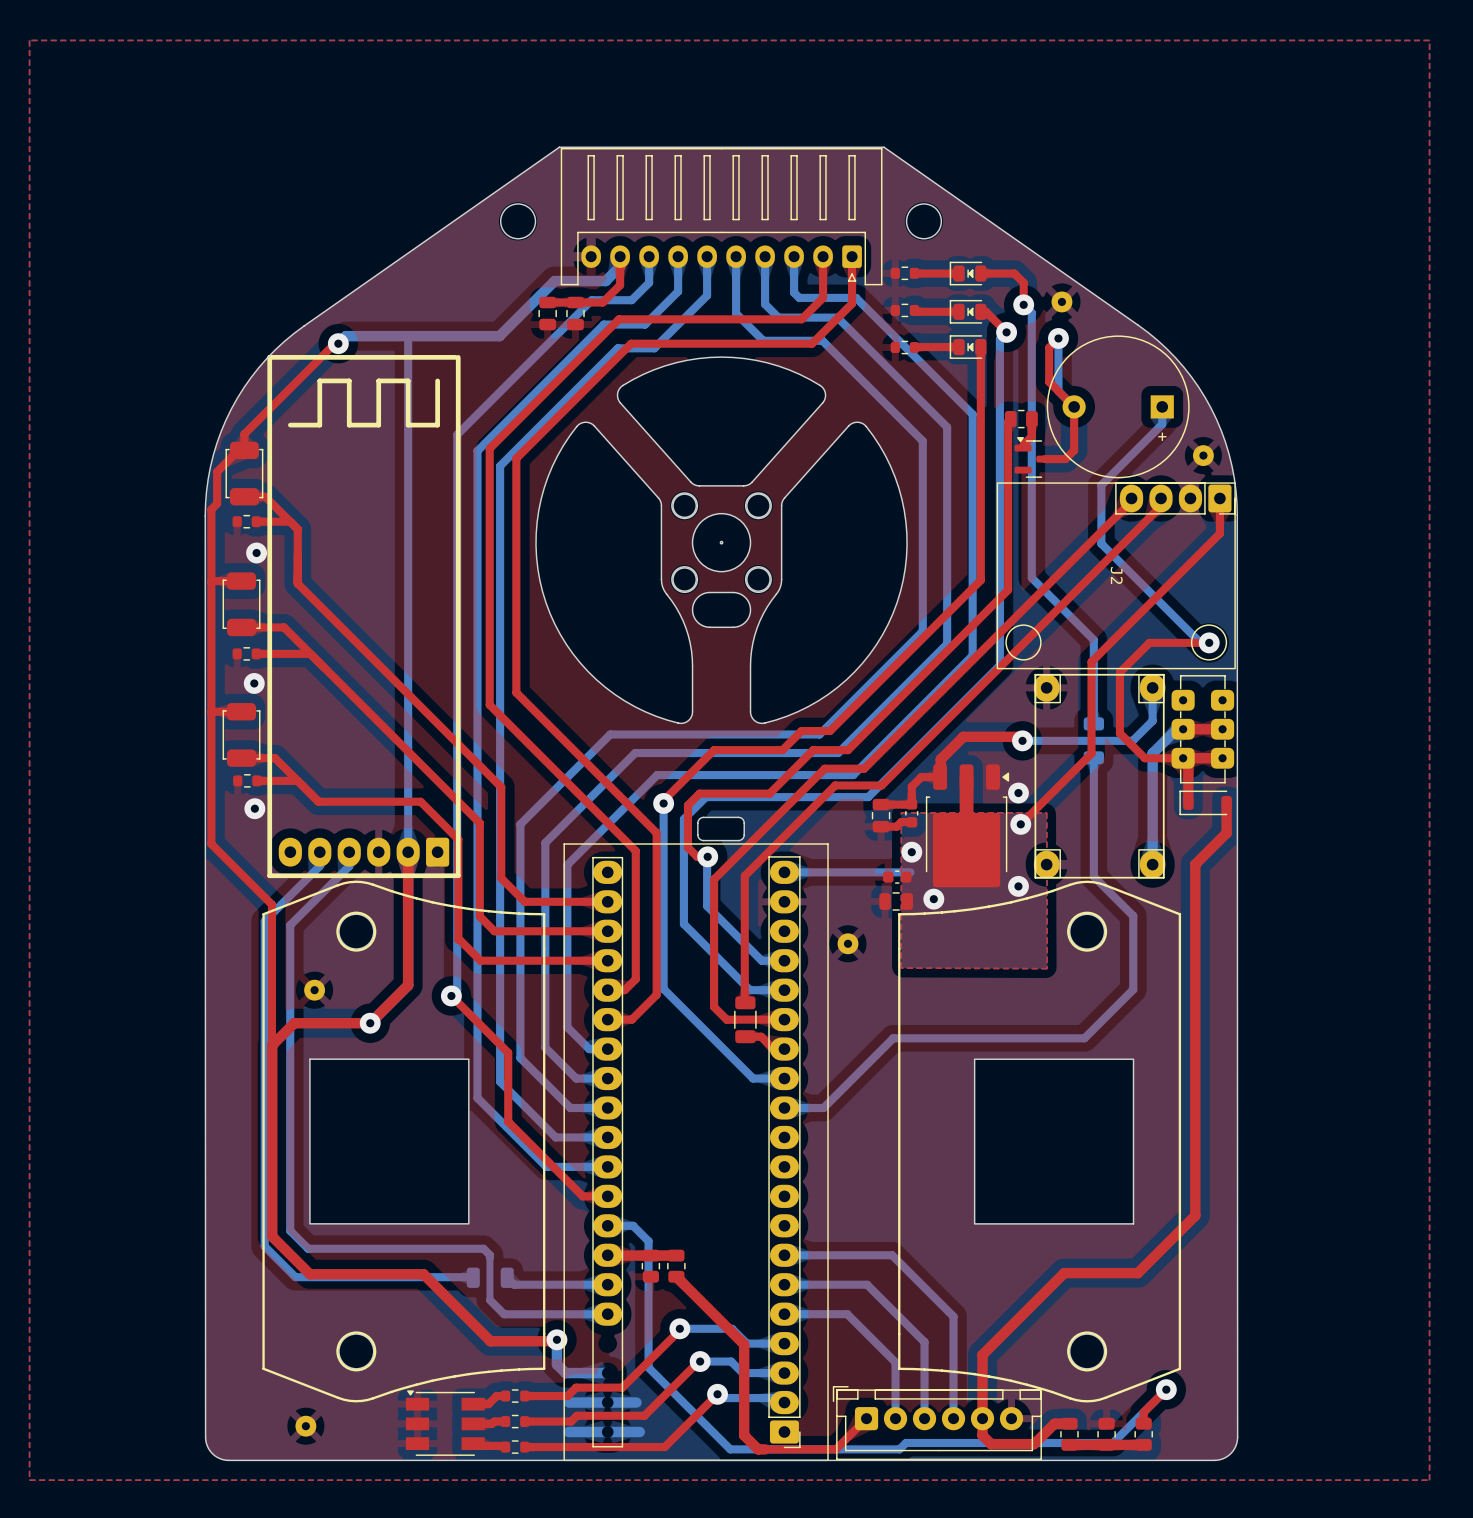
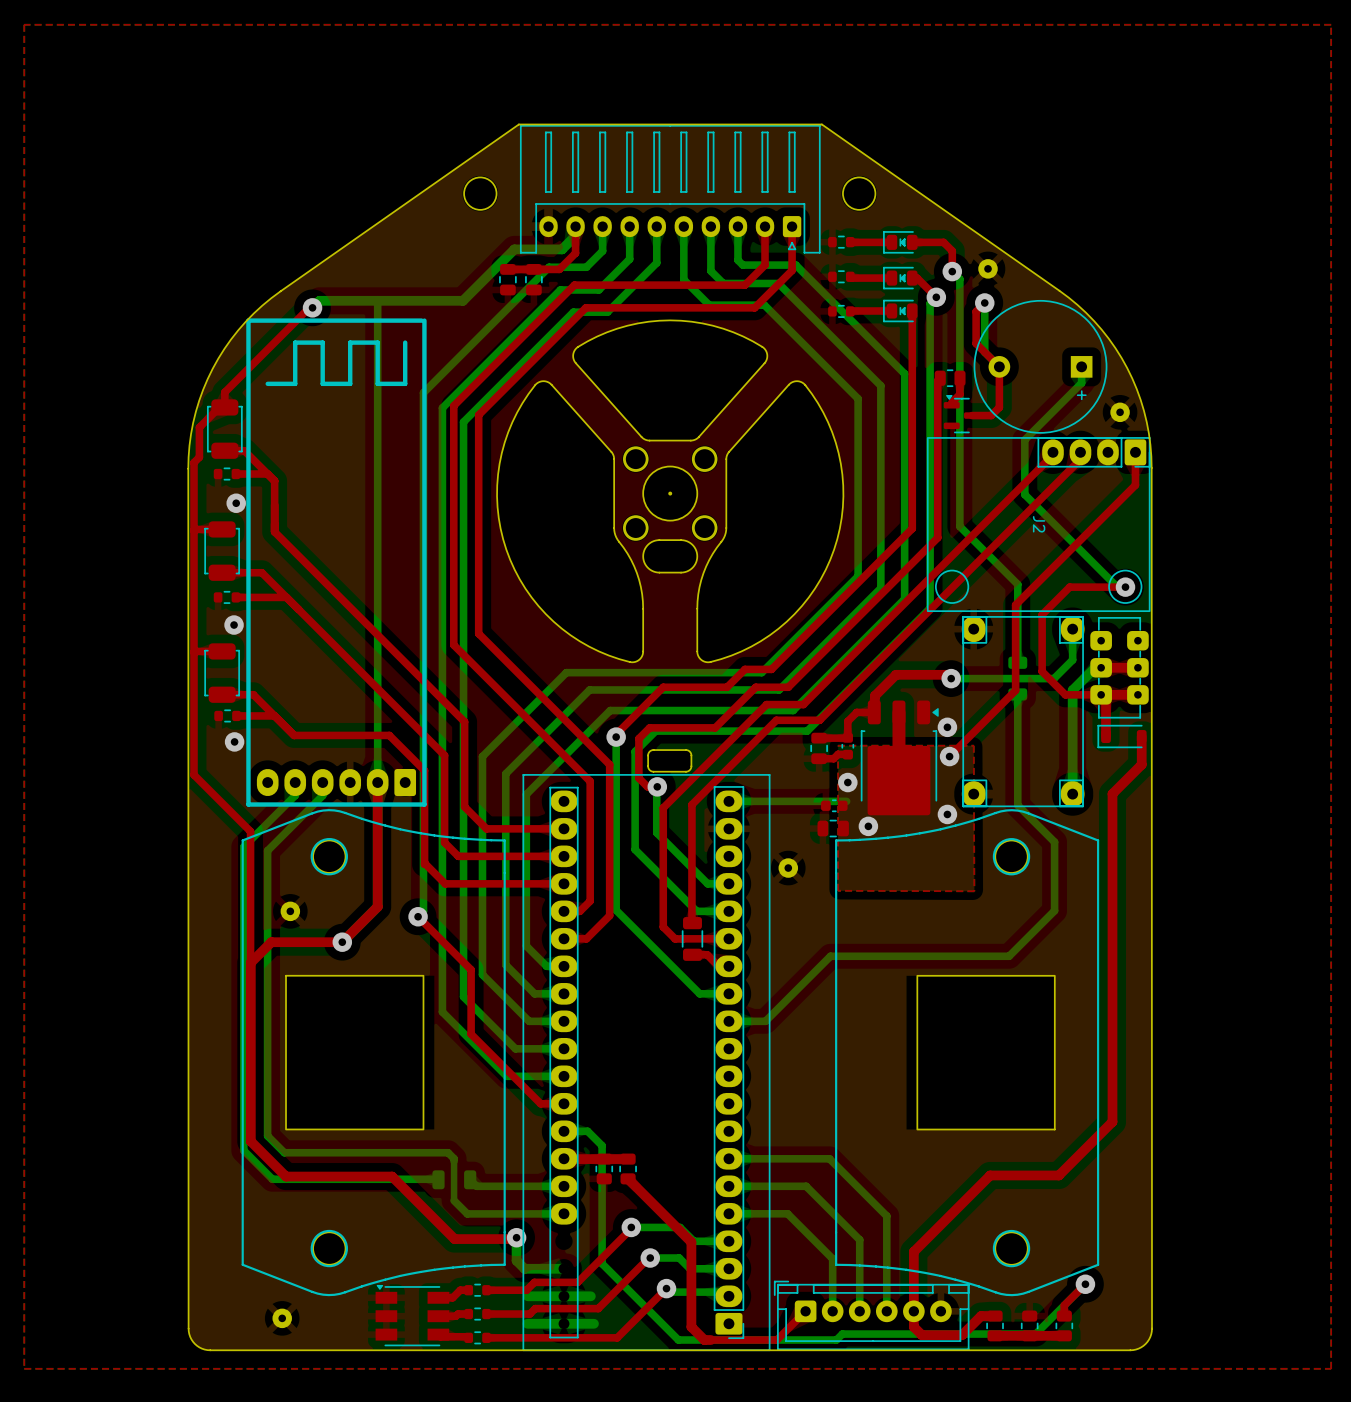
drawing shape: [262, 880, 546, 1403] -> [241, 809, 506, 1297]
drawing shape: [898, 880, 1182, 1403] -> [835, 809, 1100, 1297]

